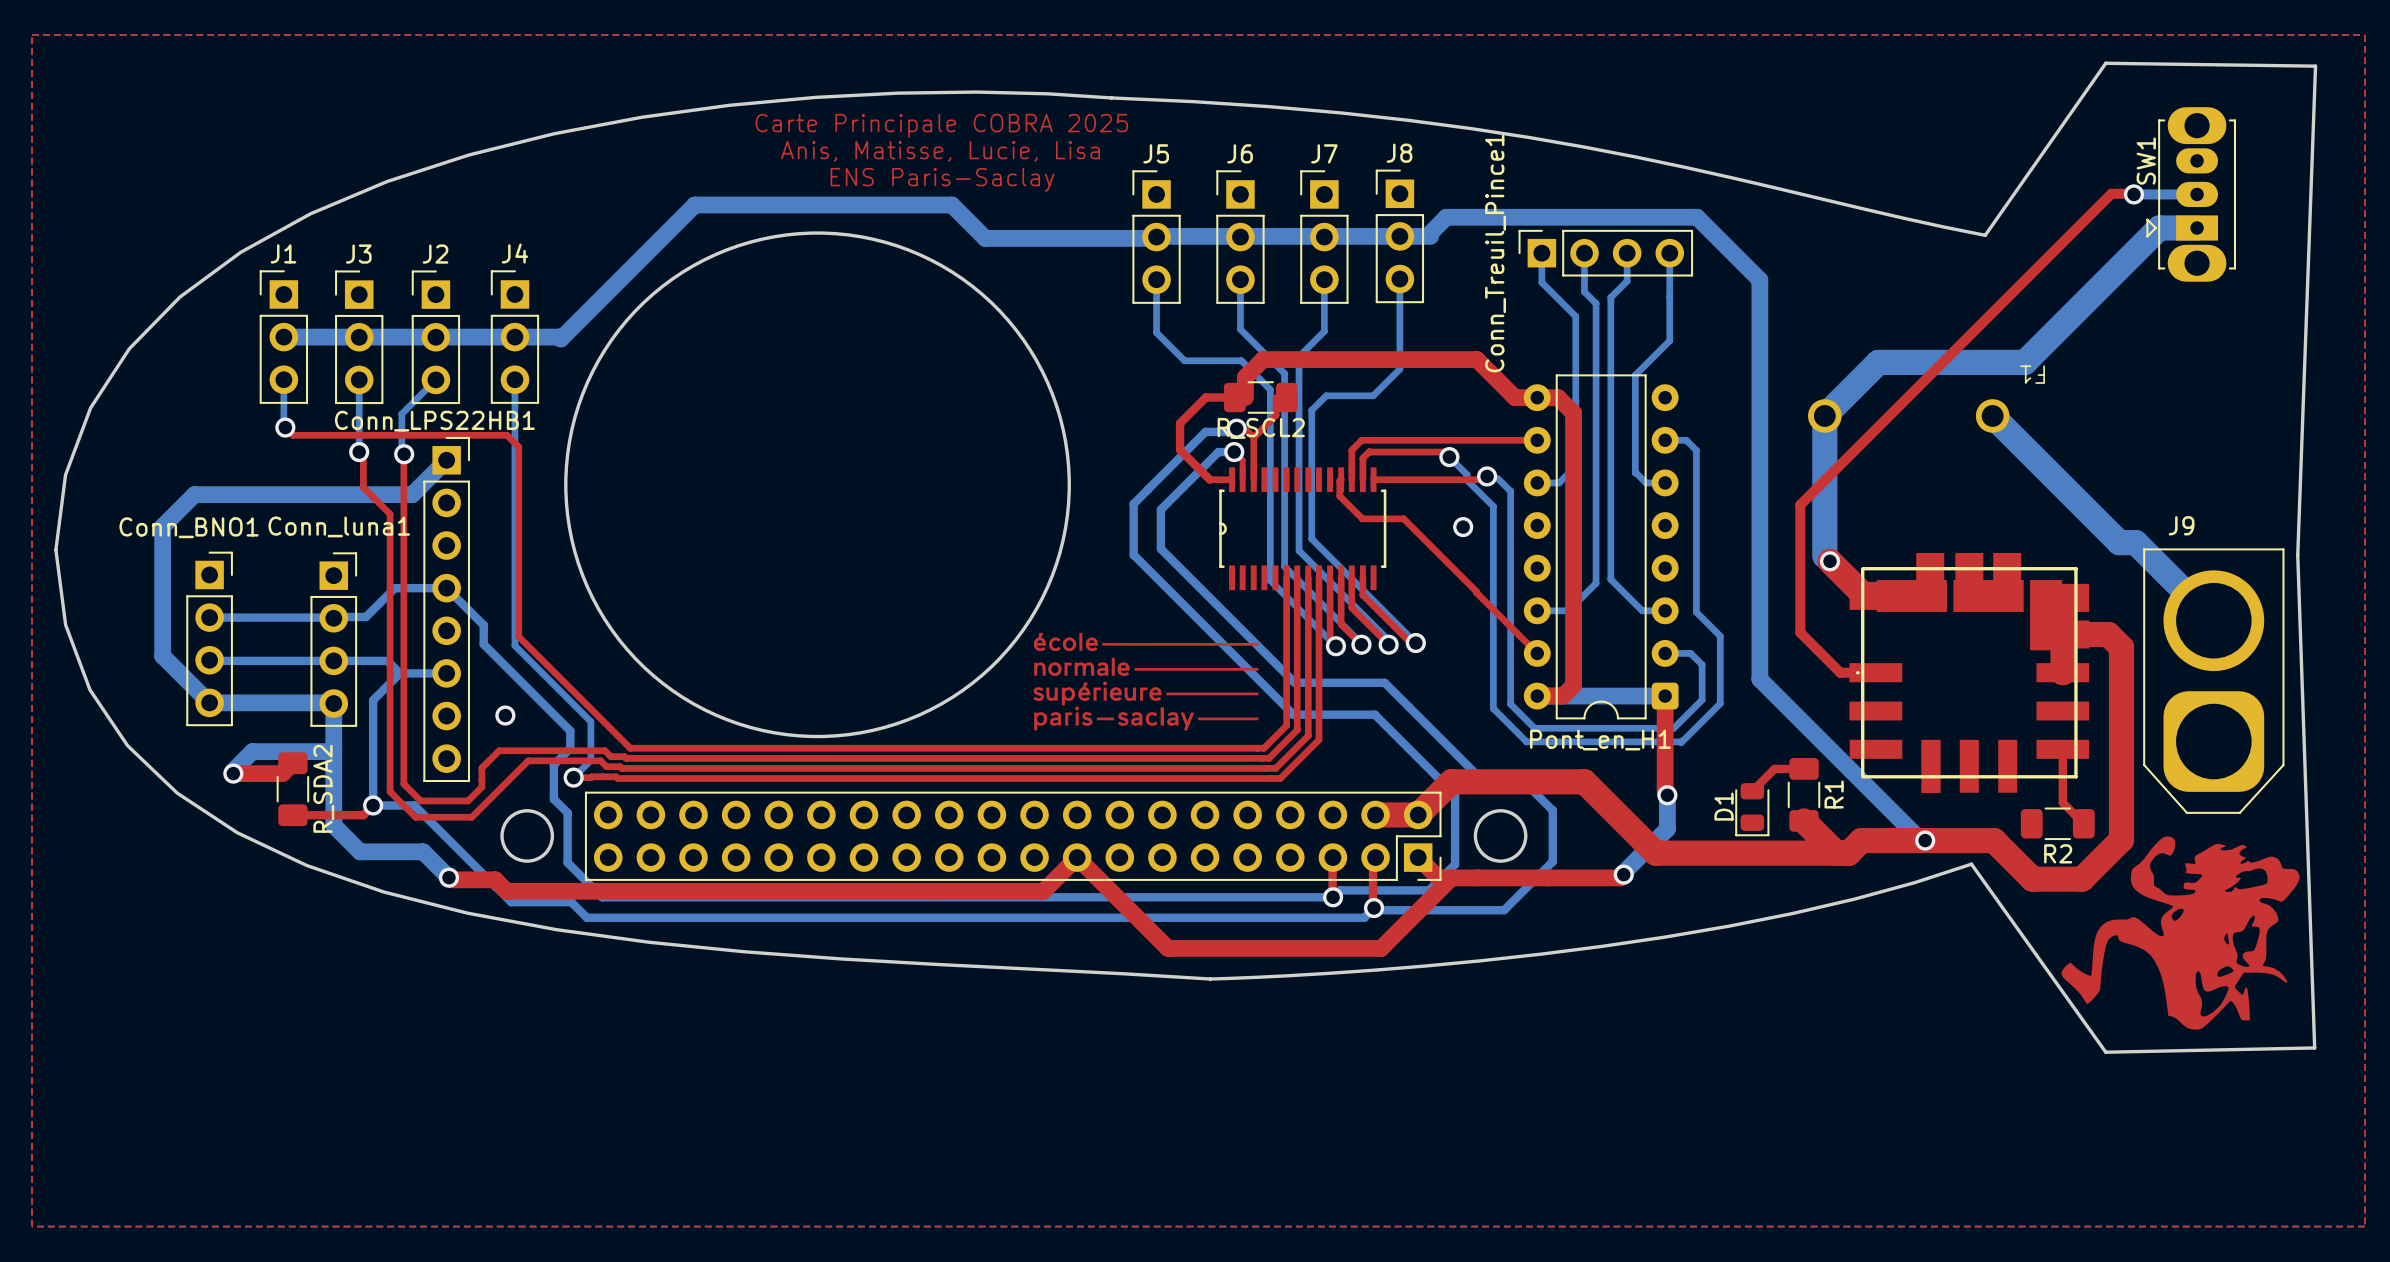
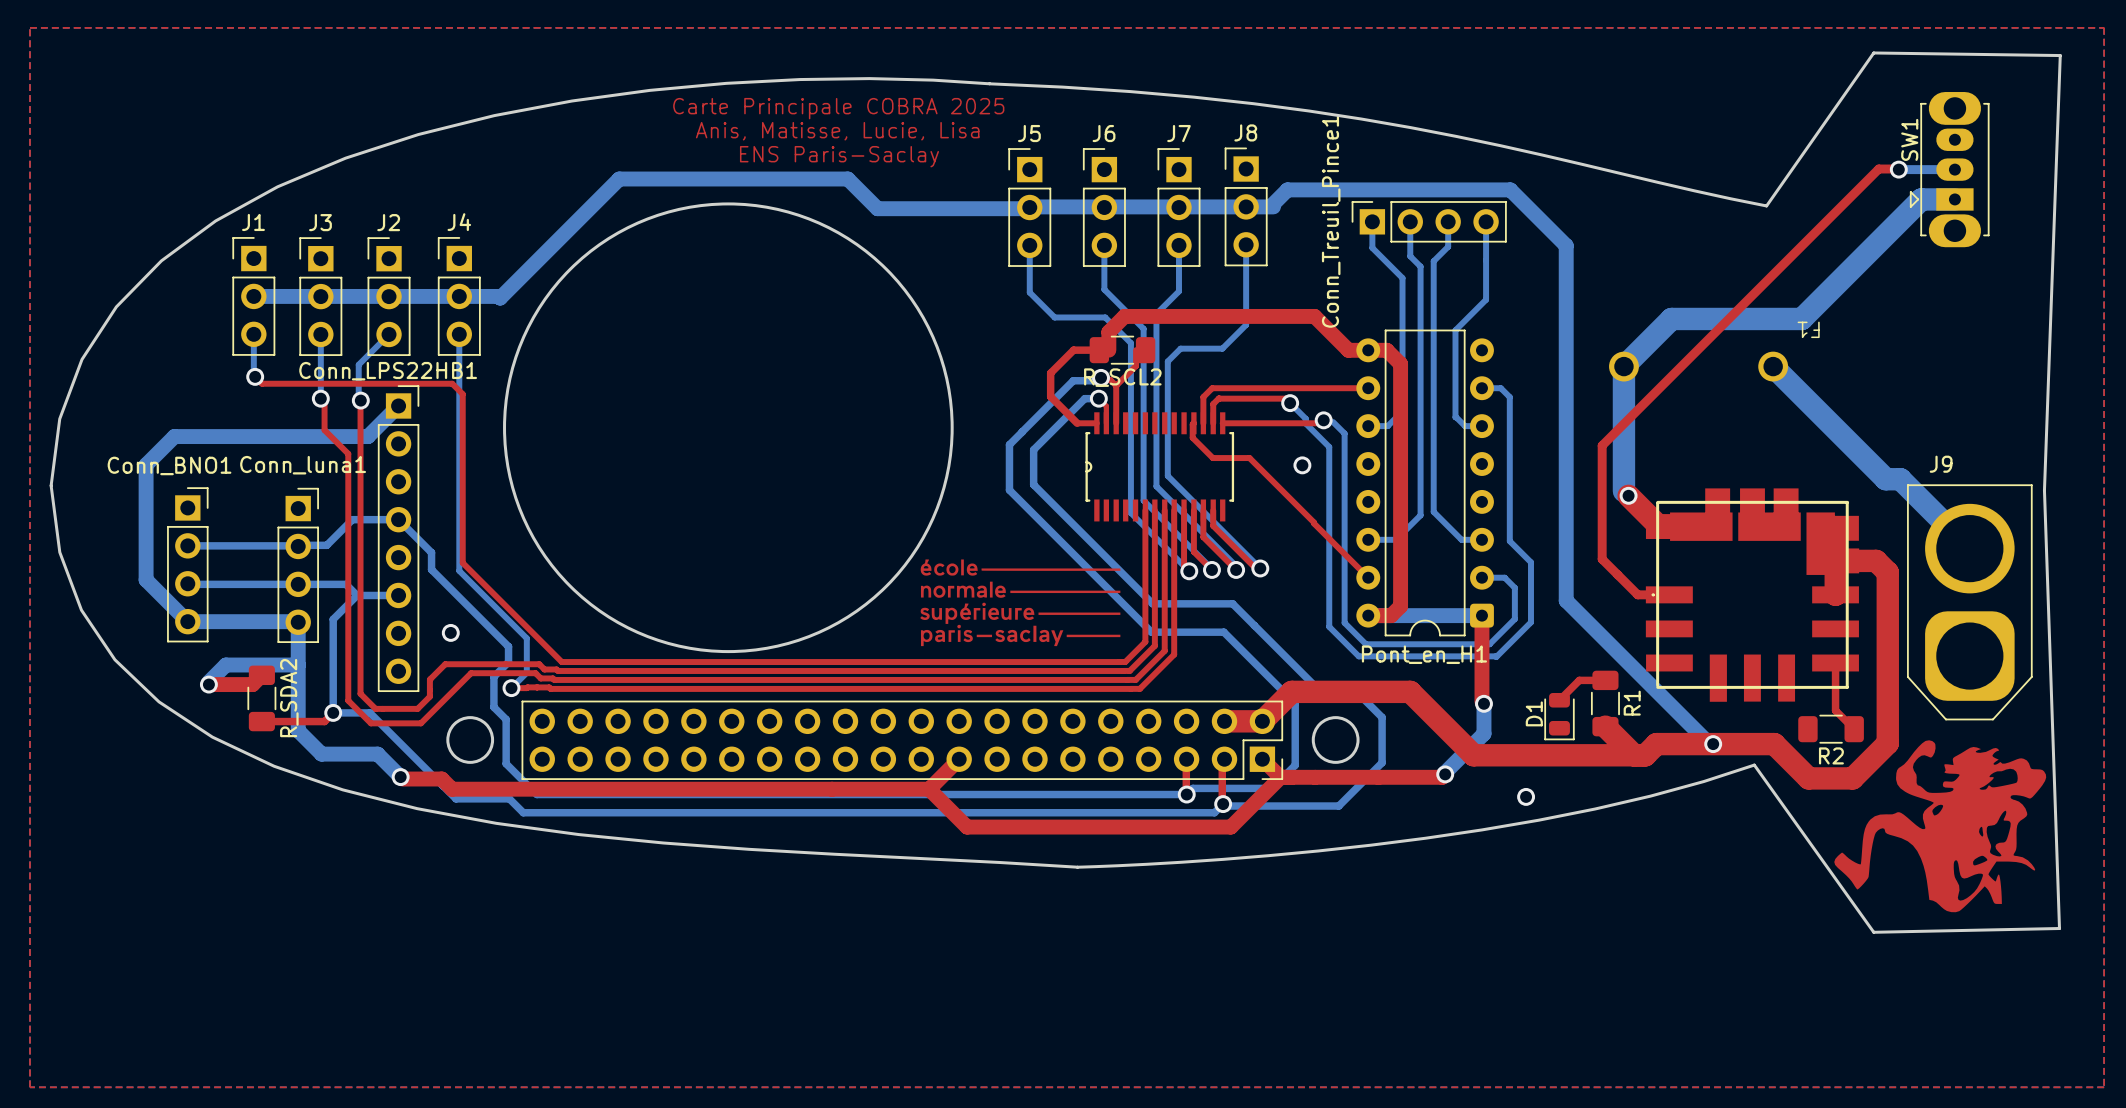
top track: (1077, 857) (1167, 948) (1381, 948) (1451, 877) -> none
top track: none -> (1280, 777) (1230, 827) (967, 827) (929, 789)
via: none -> (1526, 796)

